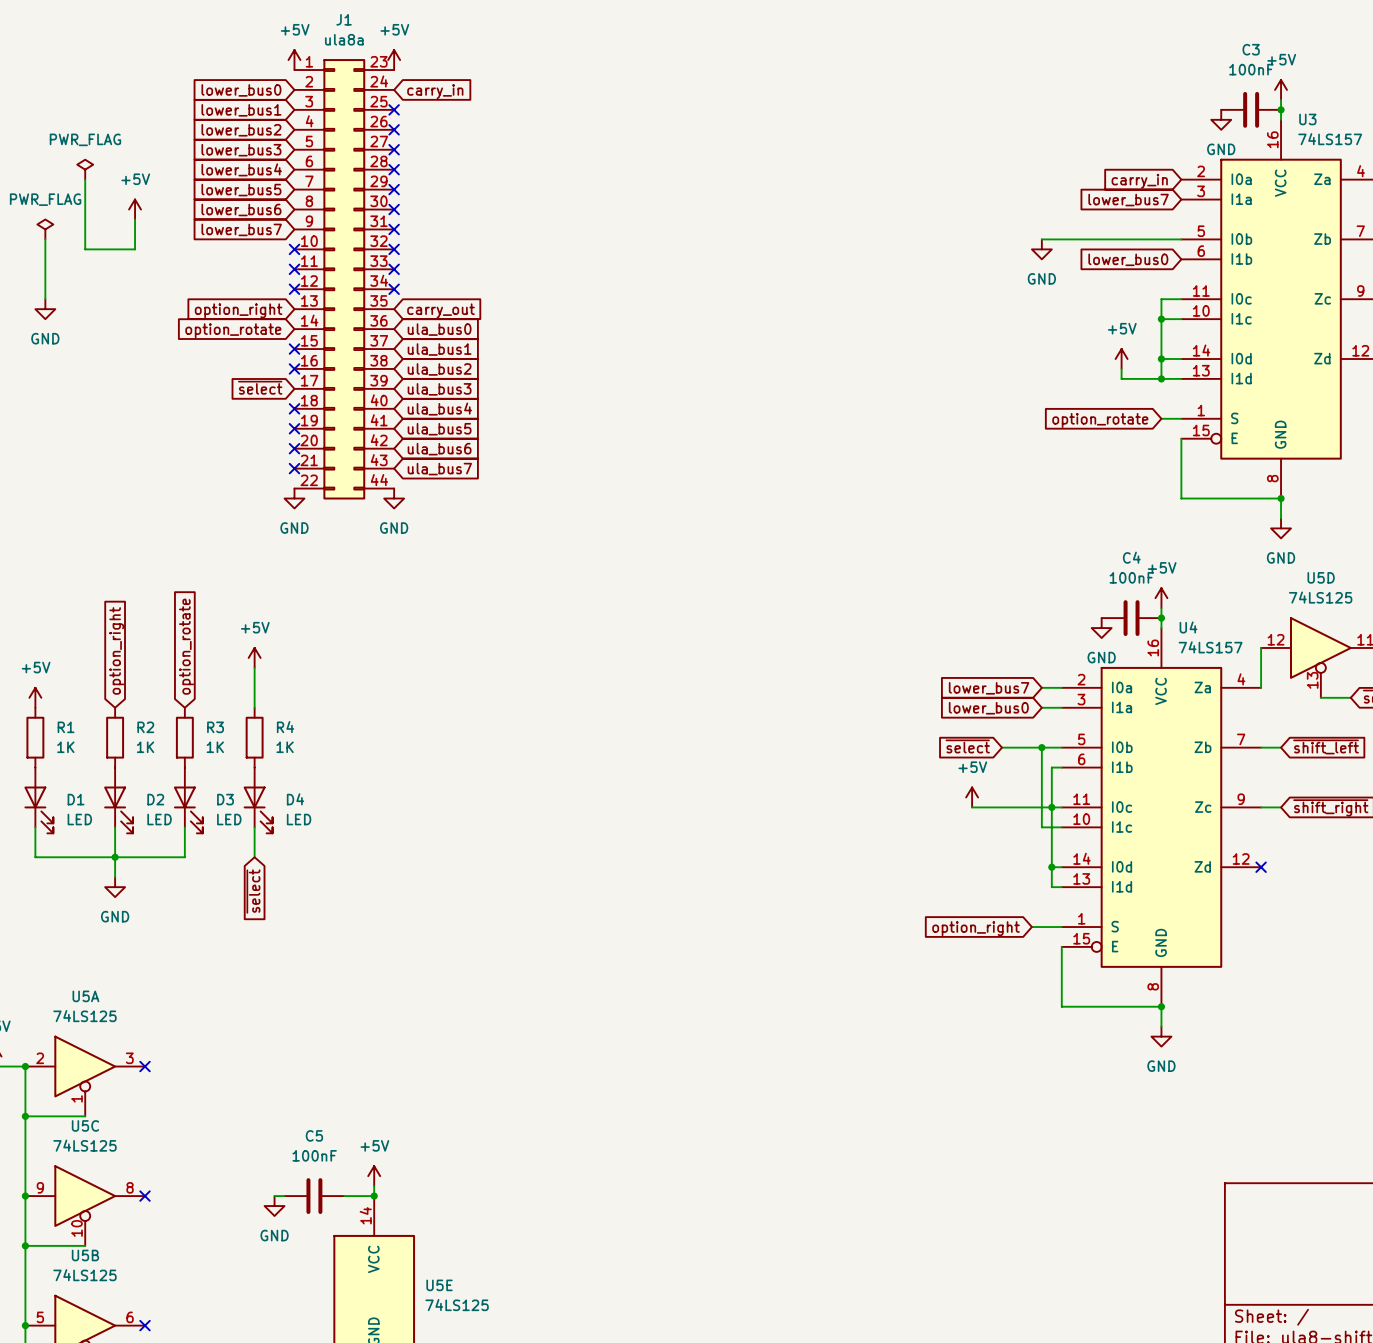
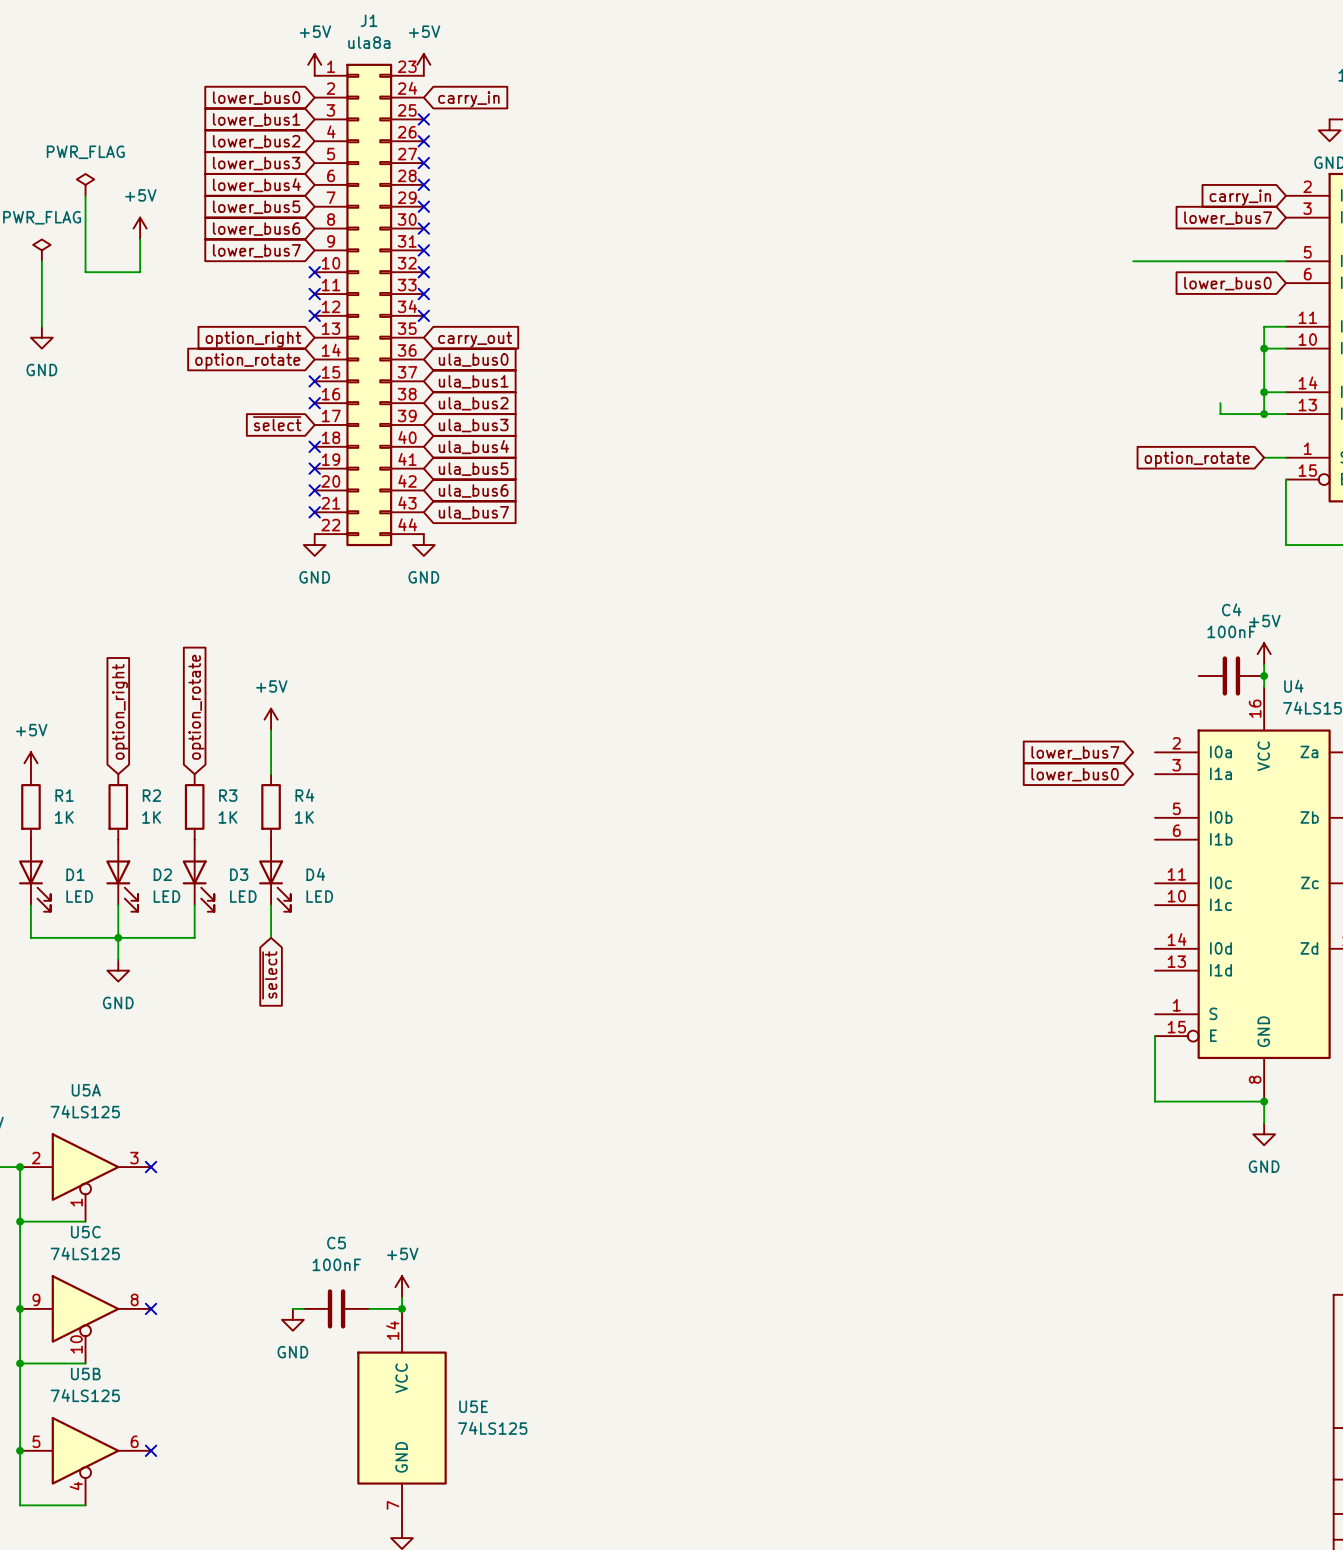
power symbol: GND (1041, 249) -> none
power symbol: +5V (1121, 359) -> none
power symbol: GND (1101, 628) -> none
wire: (1041, 687) (1061, 687) -> none
wire: (1041, 707) (1061, 707) -> none
global label: ~{select} (967, 746) -> none
wire: (1002, 747) (1061, 747) -> none
wire: (1041, 747) (1041, 827) (1061, 827) -> none
junction: (1041, 747) -> none
wire: (1061, 767) (1051, 767) (1051, 887) (1061, 887) -> none
power symbol: +5V (972, 797) -> none
wire: (972, 807) (1061, 807) -> none
junction: (1051, 807) -> none
wire: (1051, 867) (1061, 867) -> none
junction: (1051, 867) -> none
wire: (1031, 927) (1061, 927) -> none
global label: option_right (976, 928) -> none

